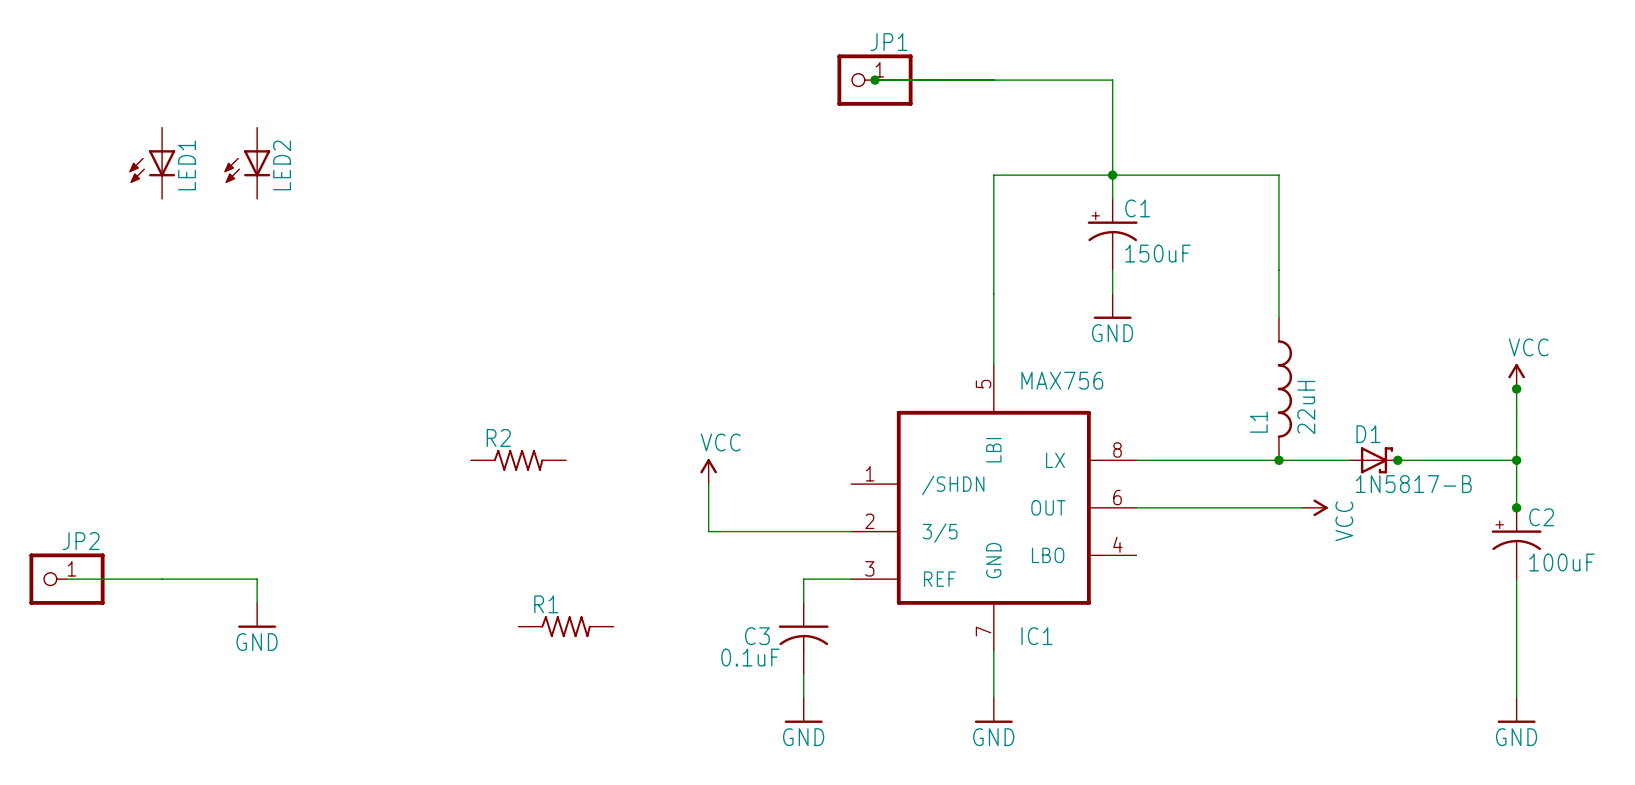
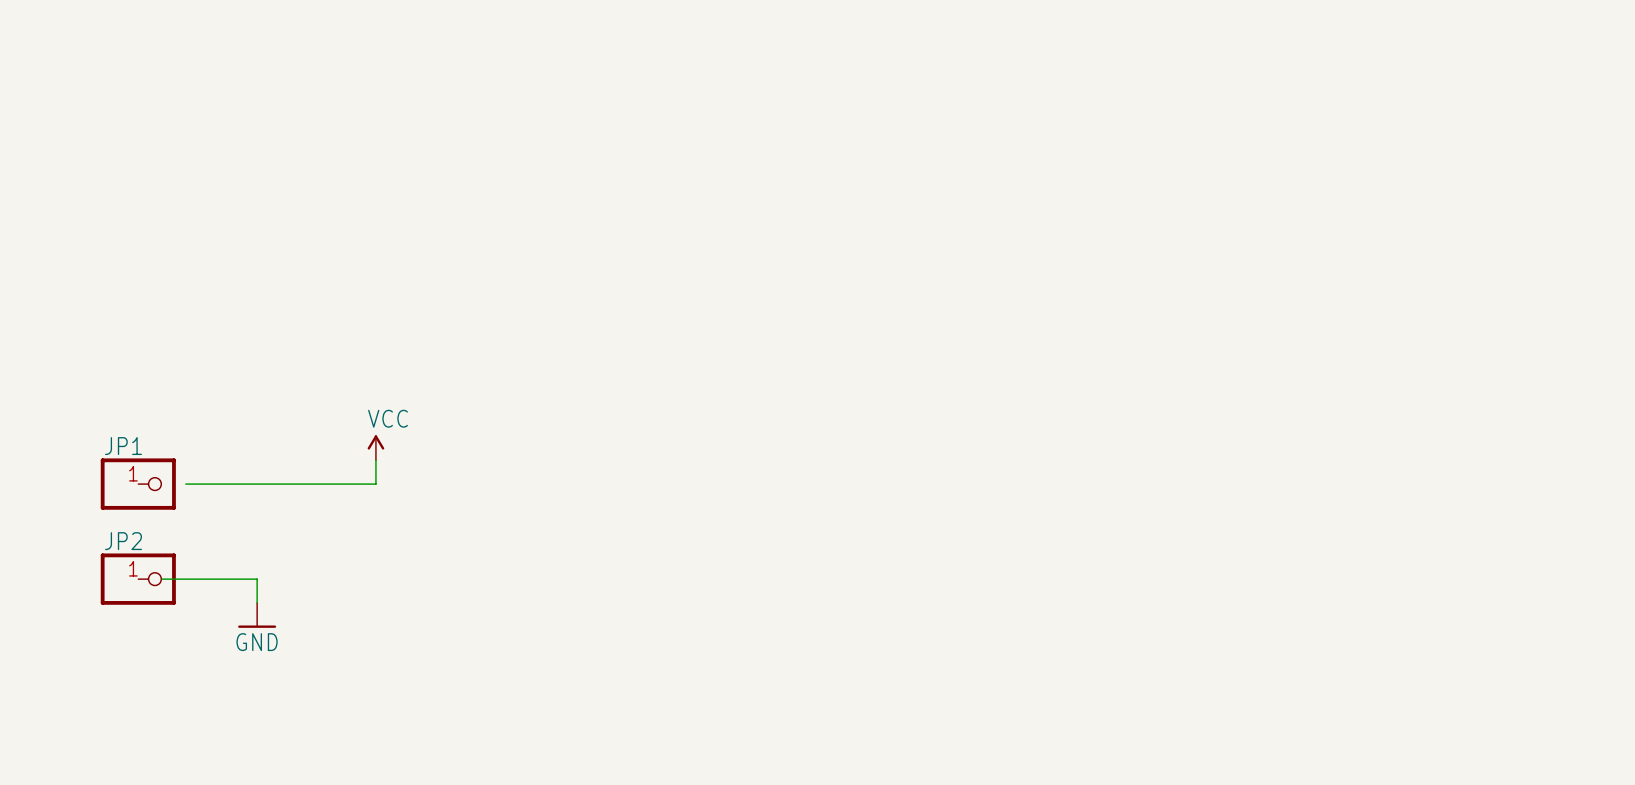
JP1 name position: JP1 (889, 42) -> JP1 (123, 446)
wire: (875, 80) (1112, 80) (1112, 198) -> none
JP1 rotation: 0° (875, 80) -> 180° (138, 484)
JP1 position: (875, 80) -> (138, 484)
junction: (875, 80) -> none
LED1: (152, 163) -> none
LED2: (247, 163) -> none
junction: (1112, 175) -> none
C1: 150uF (1112, 234) -> none
wire: (1112, 270) (1112, 293) -> none
power symbol: GND (1112, 306) -> none
wire: (1278, 317) (1278, 175) (993, 175) (993, 365) -> none
power symbol: VCC (1516, 376) -> none
L1: 22uH (1284, 389) -> none
wire: (1516, 389) (1516, 507) -> none
junction: (1516, 389) -> none
power symbol: none -> VCC (375, 447)
wire: none -> (375, 460) (375, 484) (185, 484)
R2: (518, 460) -> none
wire: (1136, 460) (1350, 460) -> none
junction: (1278, 460) -> none
D1: 1N5817-B (1374, 460) -> none
wire: (1397, 460) (1516, 460) -> none
junction: (1397, 460) -> none
junction: (1516, 460) -> none
power symbol: VCC (708, 471) -> none
wire: (708, 484) (708, 531) (851, 531) -> none
IC1: MAX756 (993, 507) -> none
wire: (1136, 507) (1302, 507) -> none
power symbol: VCC (1315, 507) -> none
junction: (1516, 507) -> none
JP2 name position: JP2 (81, 541) -> JP2 (123, 541)
C2: 100uF (1516, 543) -> none
wire: (67, 579) (162, 579) -> none
JP2 rotation: 0° (67, 579) -> 180° (138, 579)
JP2 position: (67, 579) -> (138, 579)
wire: (851, 579) (803, 579) (803, 602) -> none
wire: (1516, 579) (1516, 697) -> none
R1: (566, 626) -> none
C3: 0.1uF (803, 638) -> none
wire: (993, 650) (993, 697) -> none
wire: (803, 674) (803, 697) -> none
power symbol: GND (803, 710) -> none
power symbol: GND (993, 710) -> none
power symbol: GND (1516, 710) -> none

